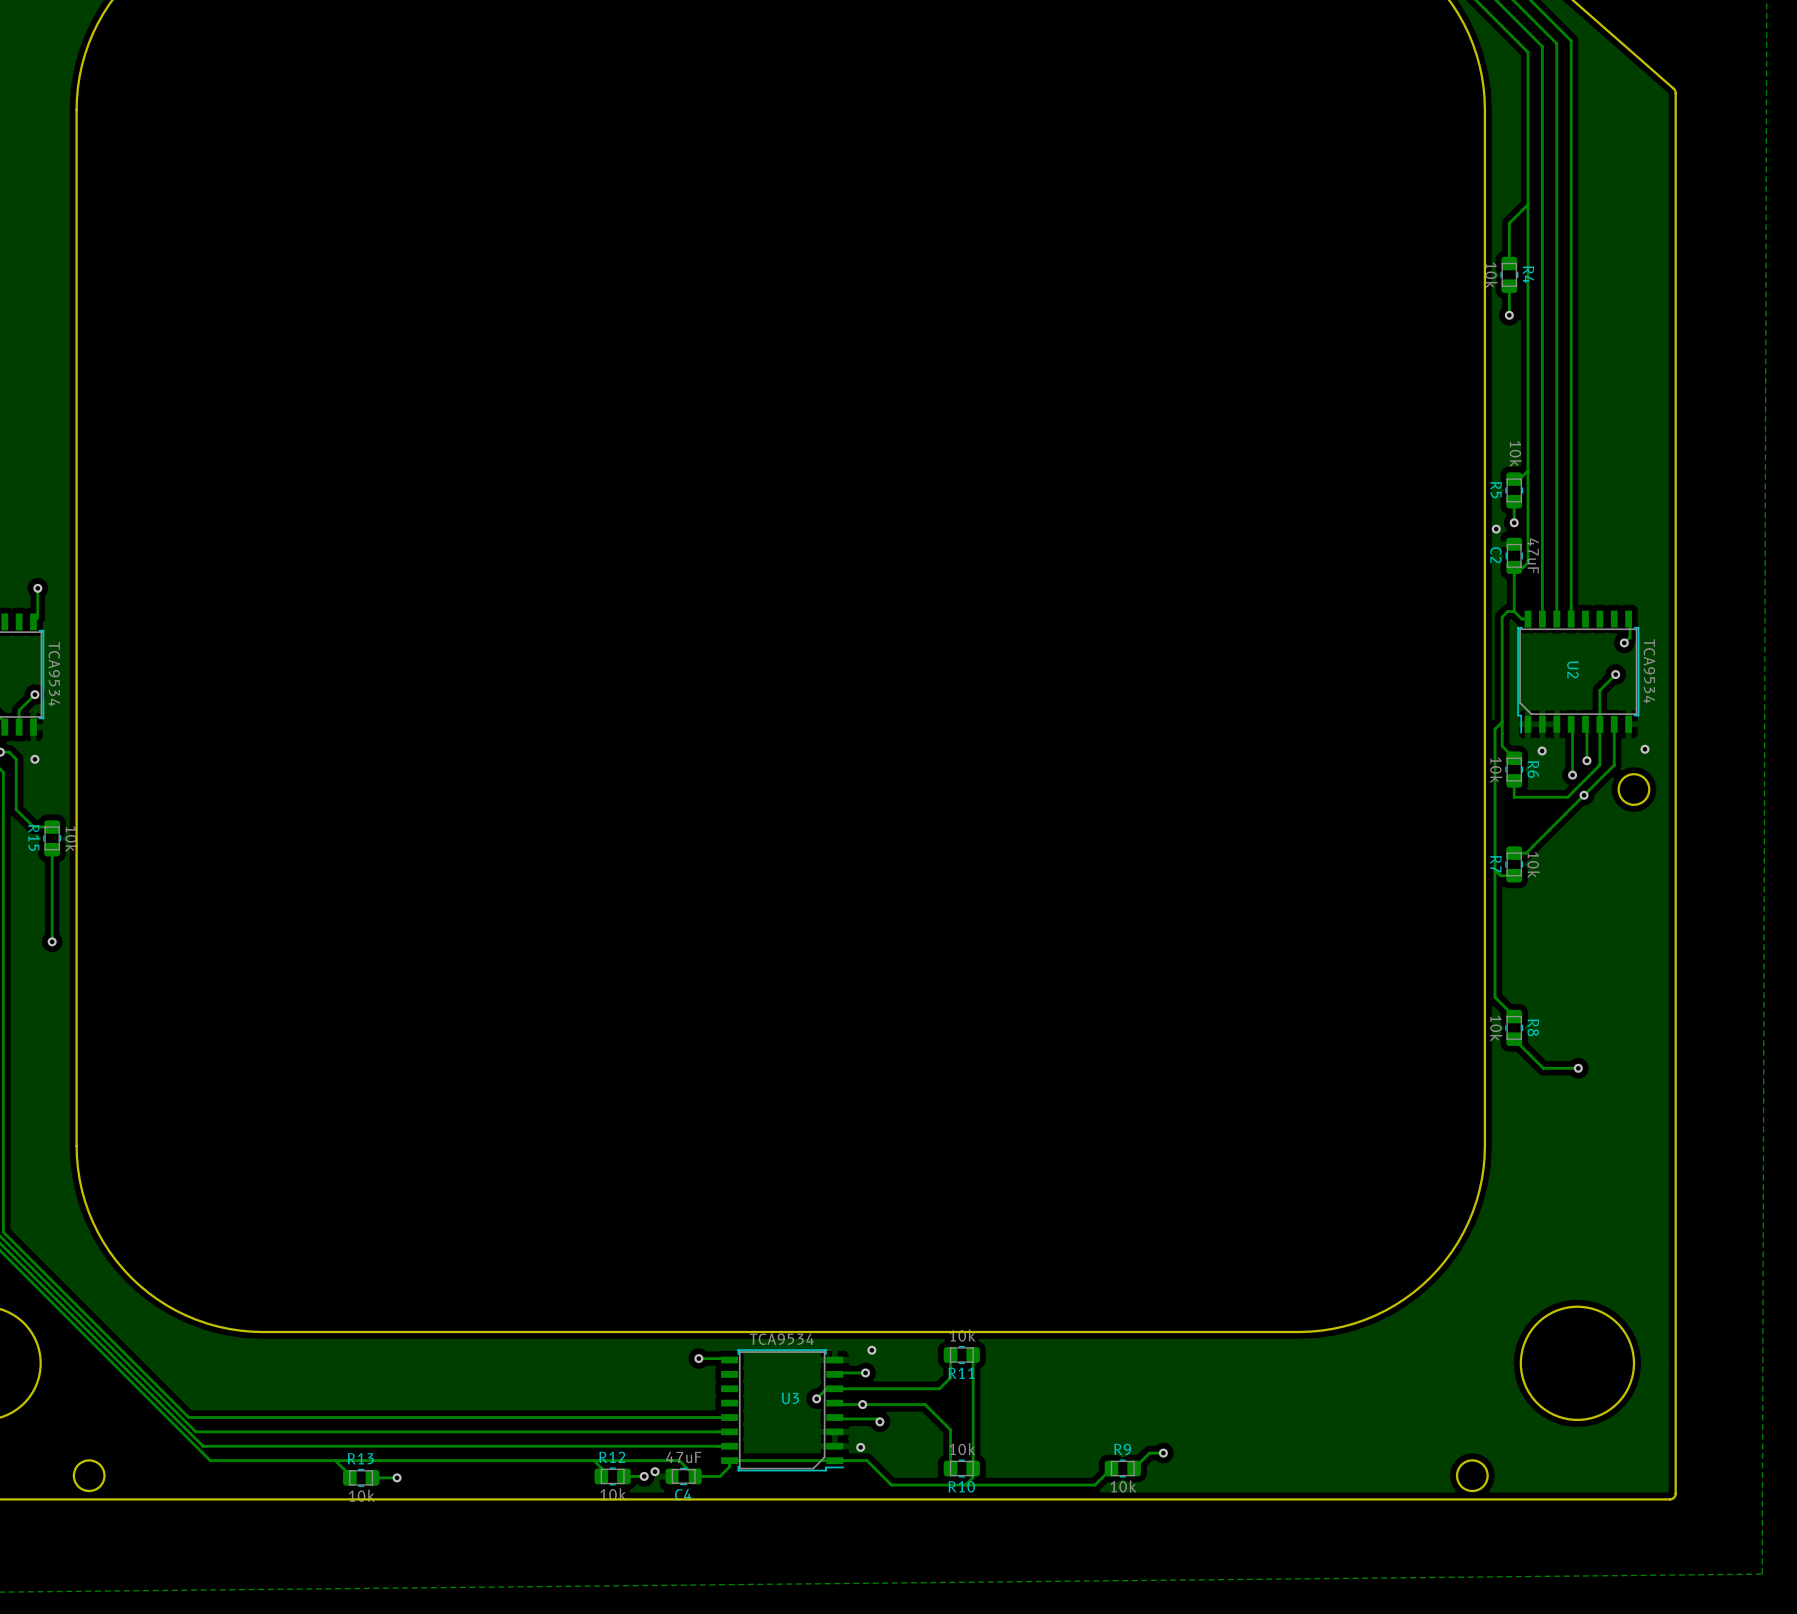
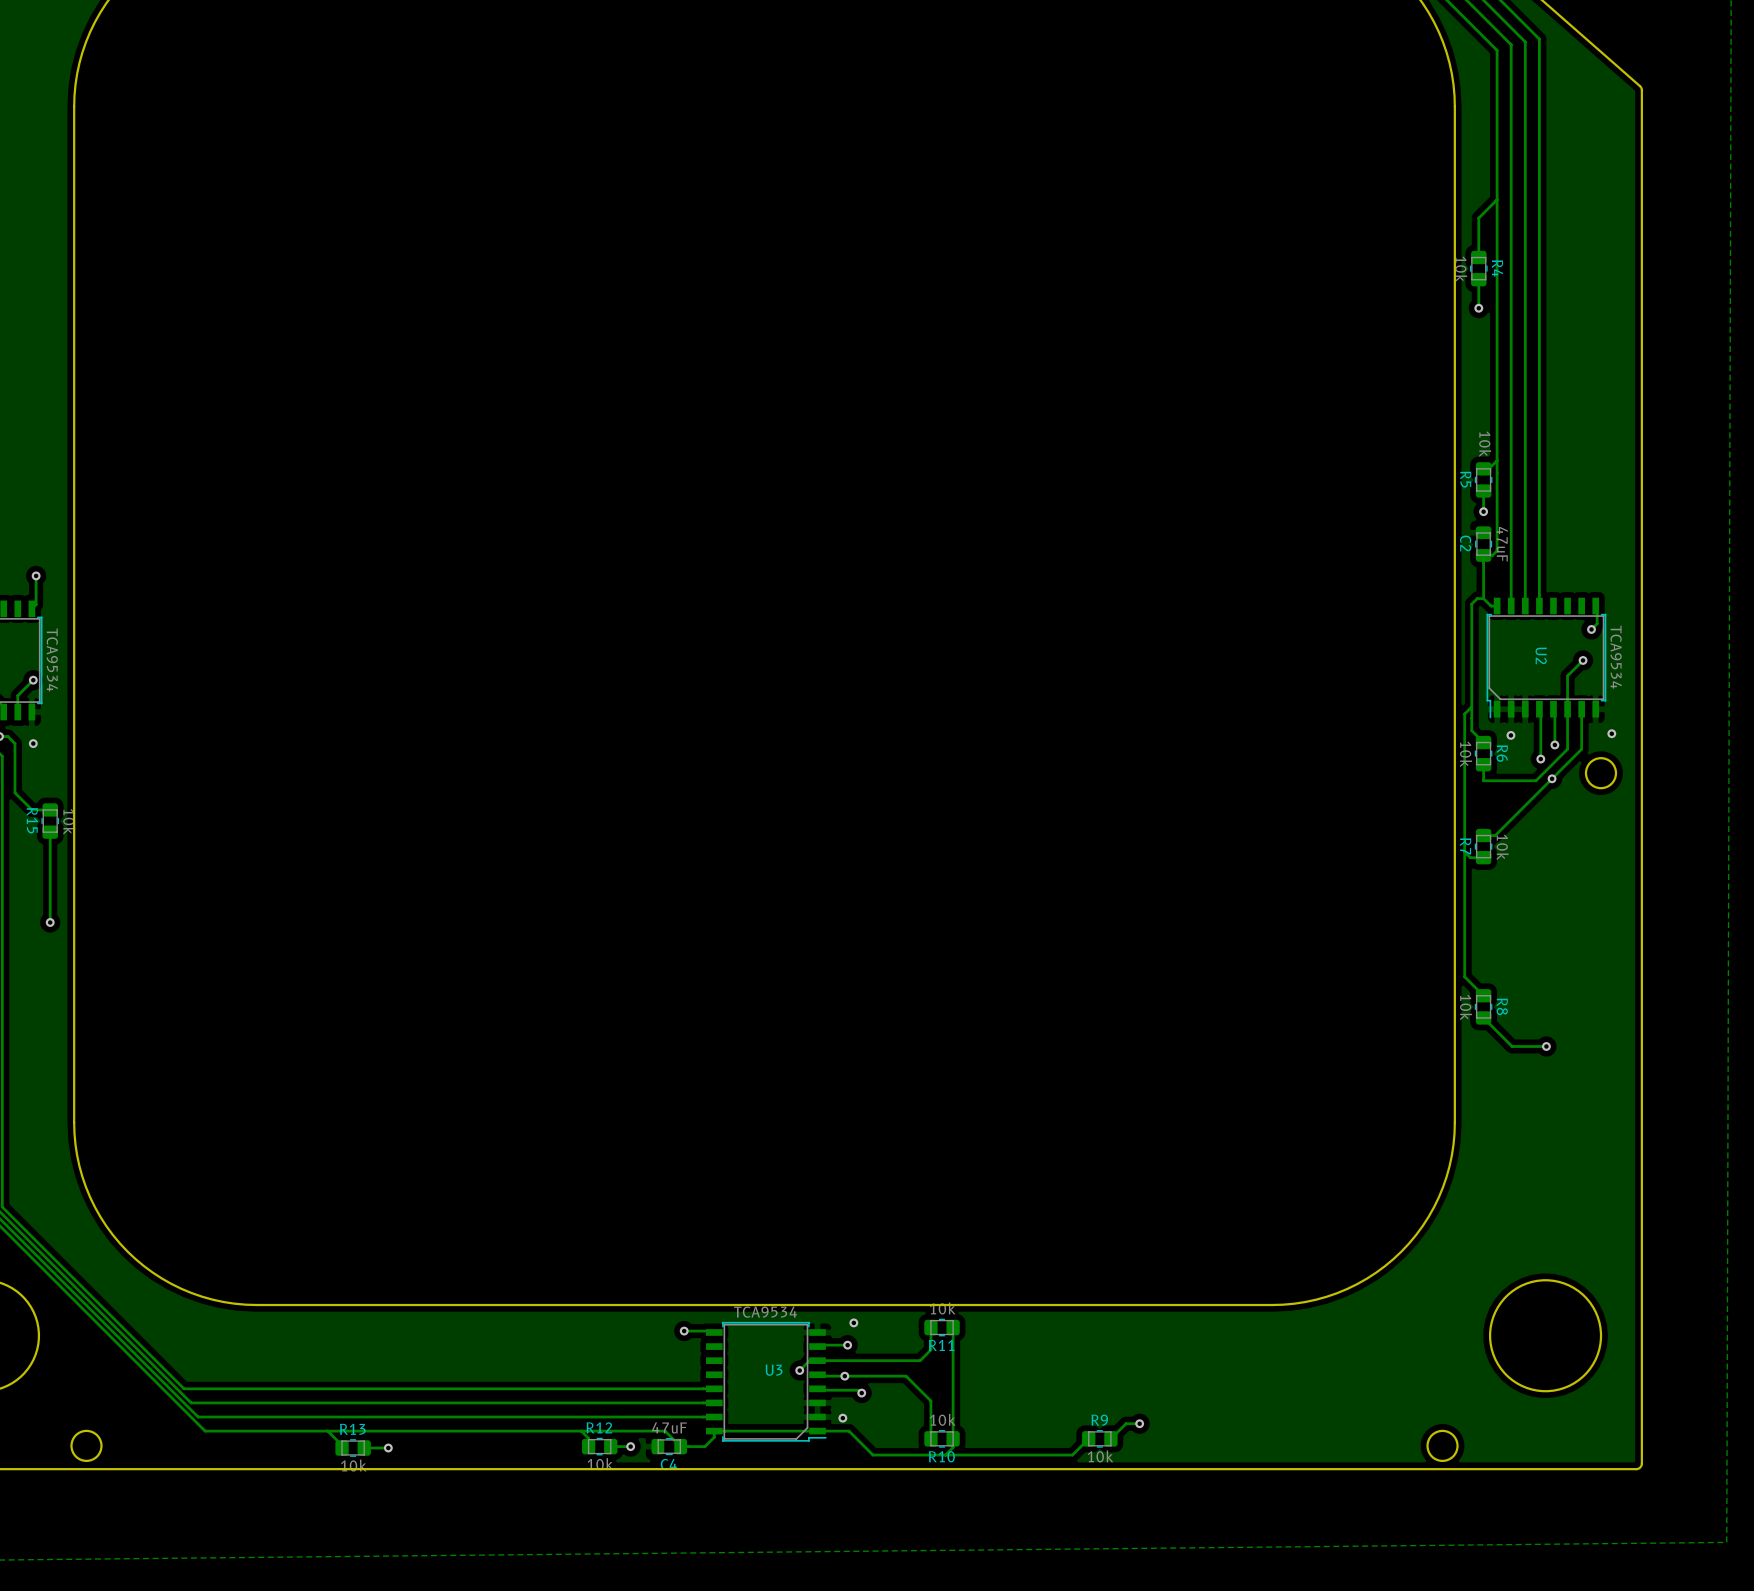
via: (1496, 529) -> none
via: (655, 1471) -> none

